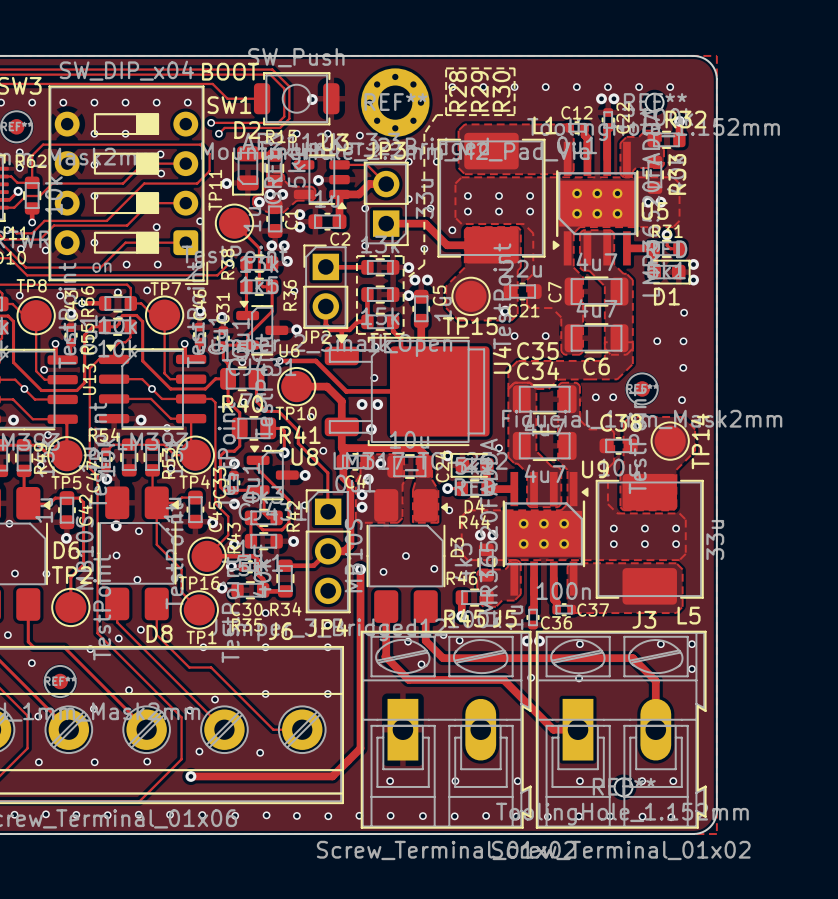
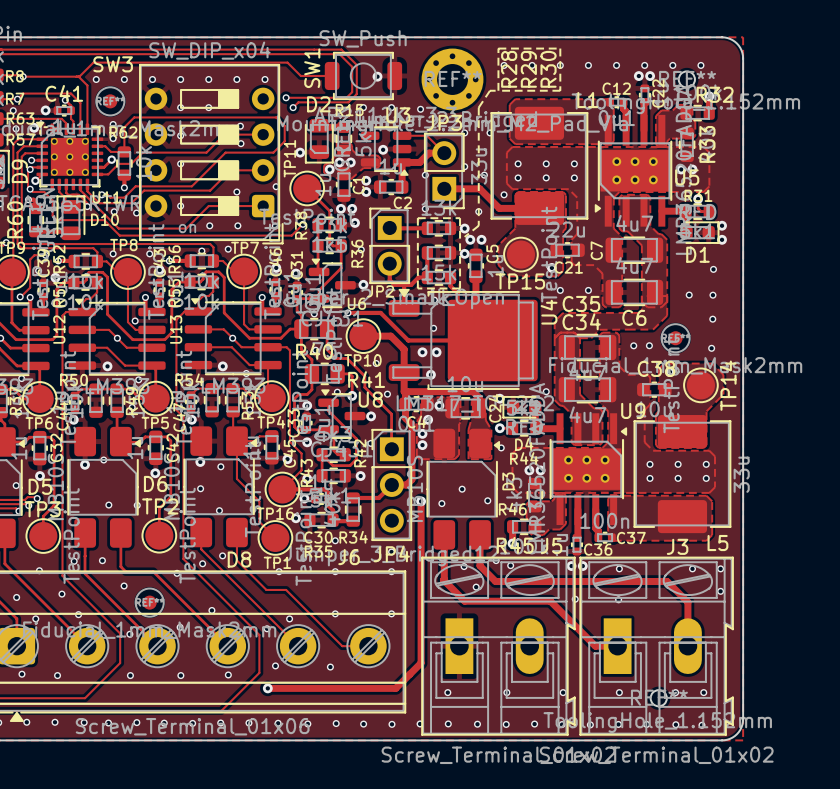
text: BOOT (230, 71) -> none
SW1 name rotation: 0° (229, 105) -> 90° counterclockwise (312, 68)

